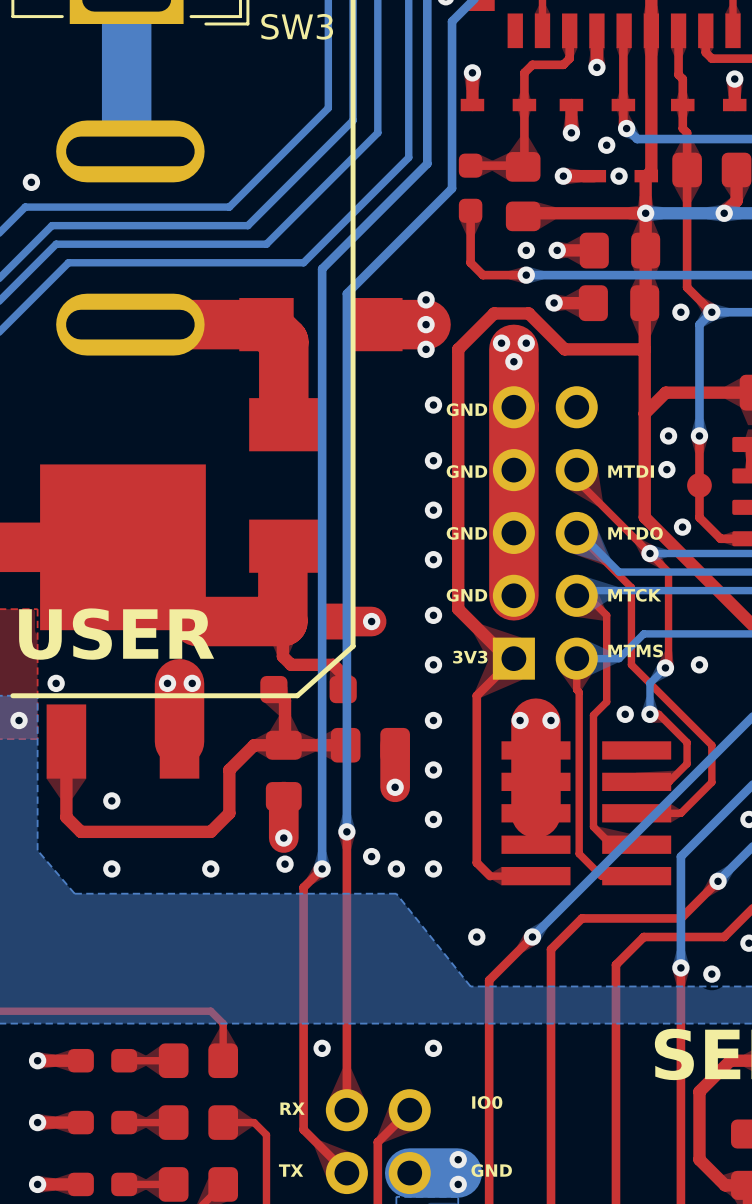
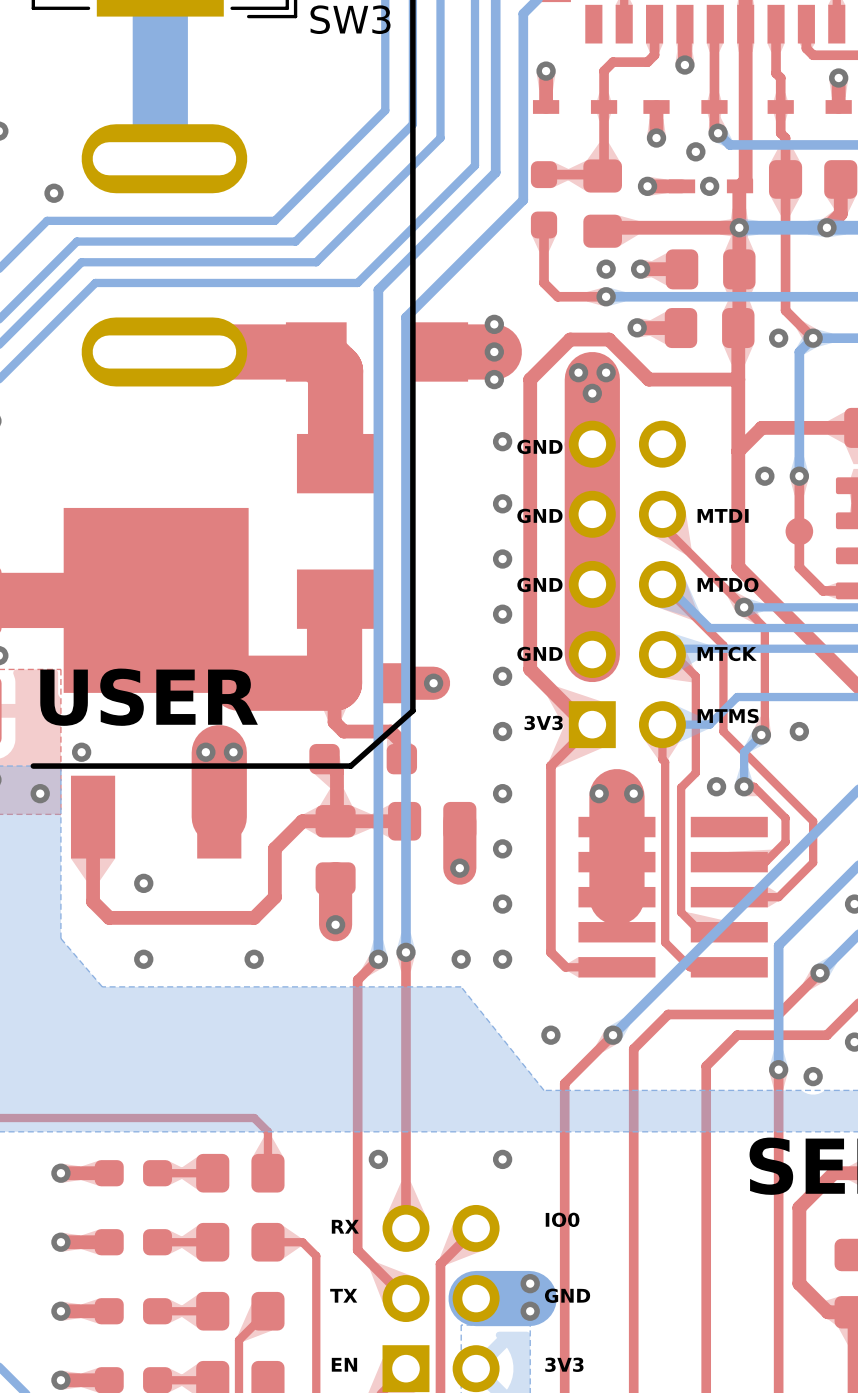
via: (666, 469) -> none
via: (682, 527) -> none
top track: (346, 831) (346, 862) -> none
bottom track: none -> (405, 917) (405, 952)
via: (346, 831) -> none
via: (371, 856) -> none
via: none -> (405, 952)
via: (285, 864) -> none

